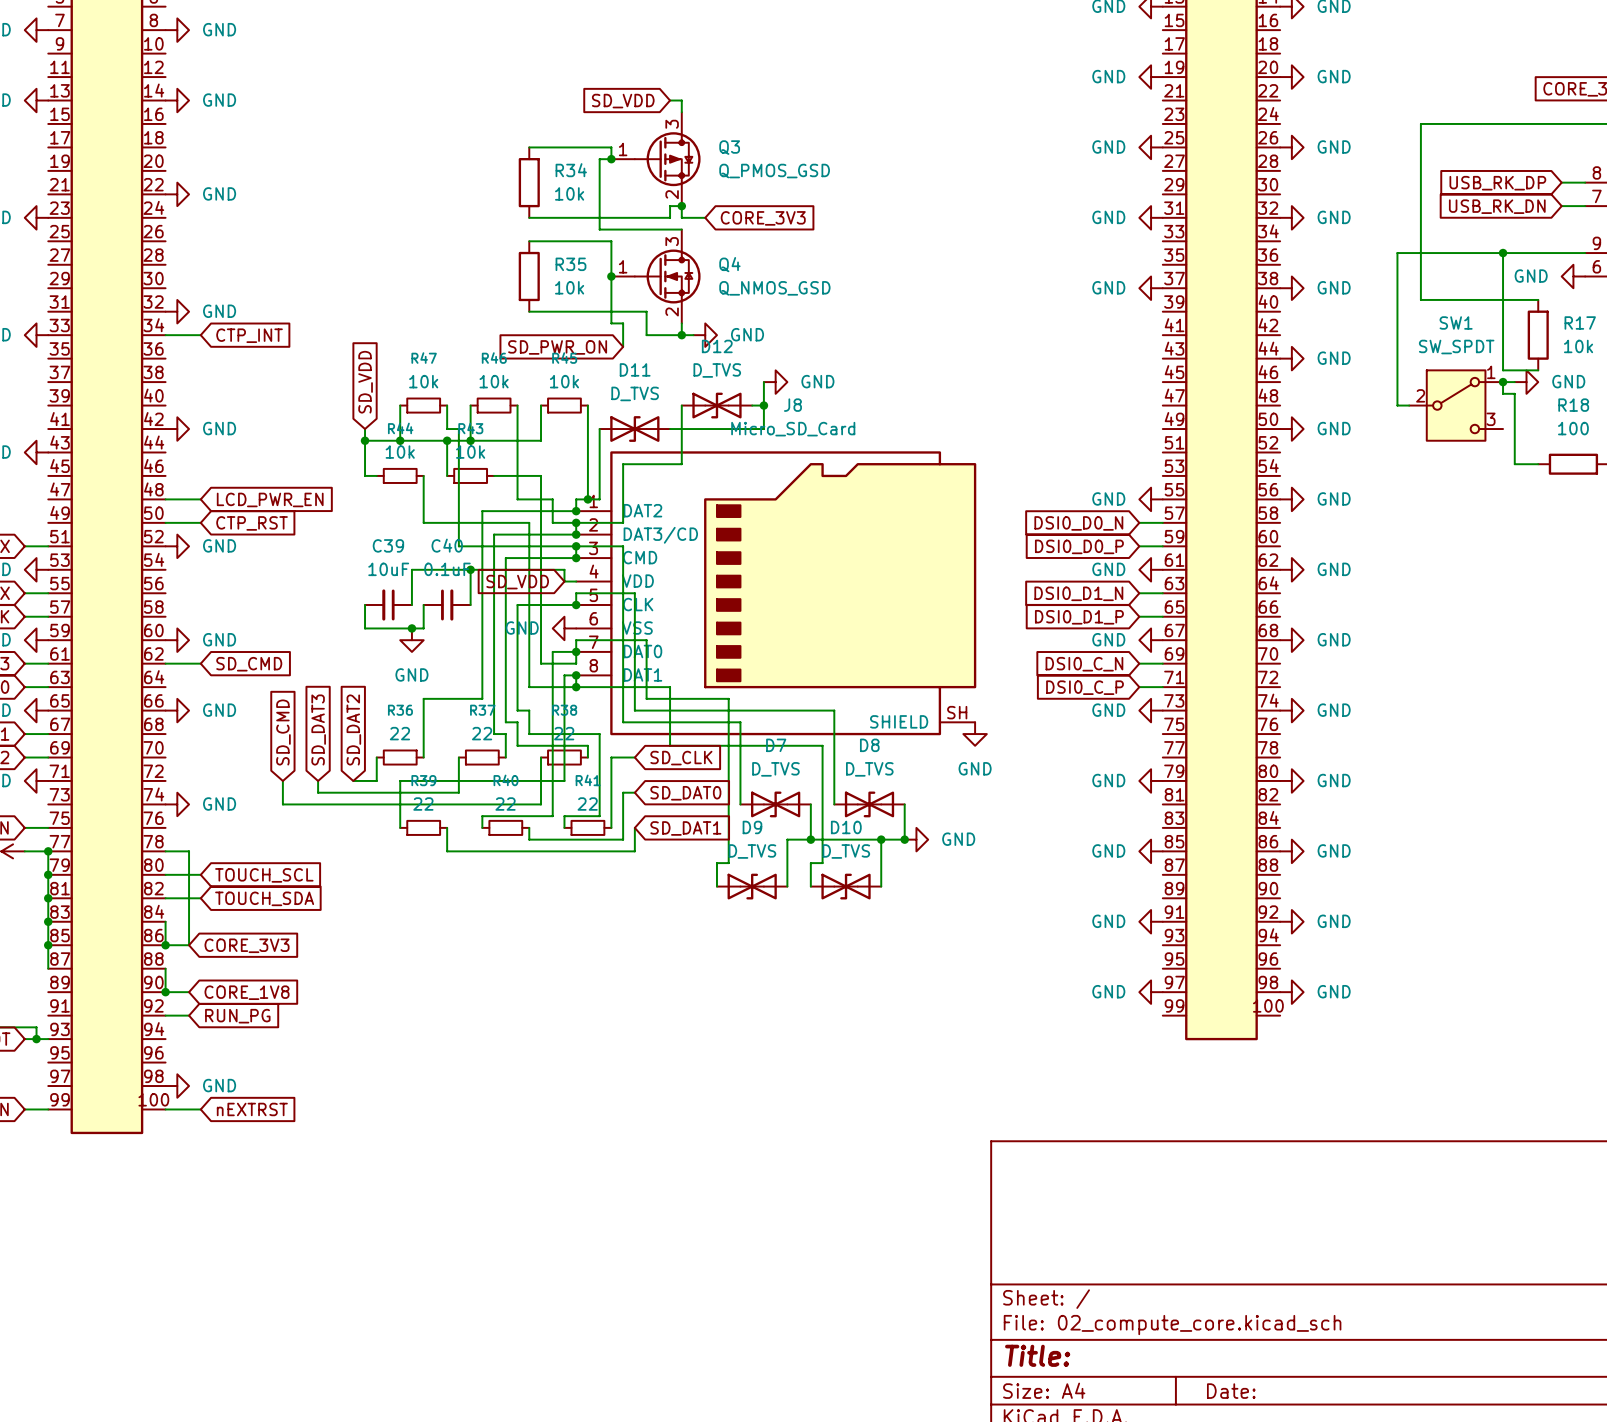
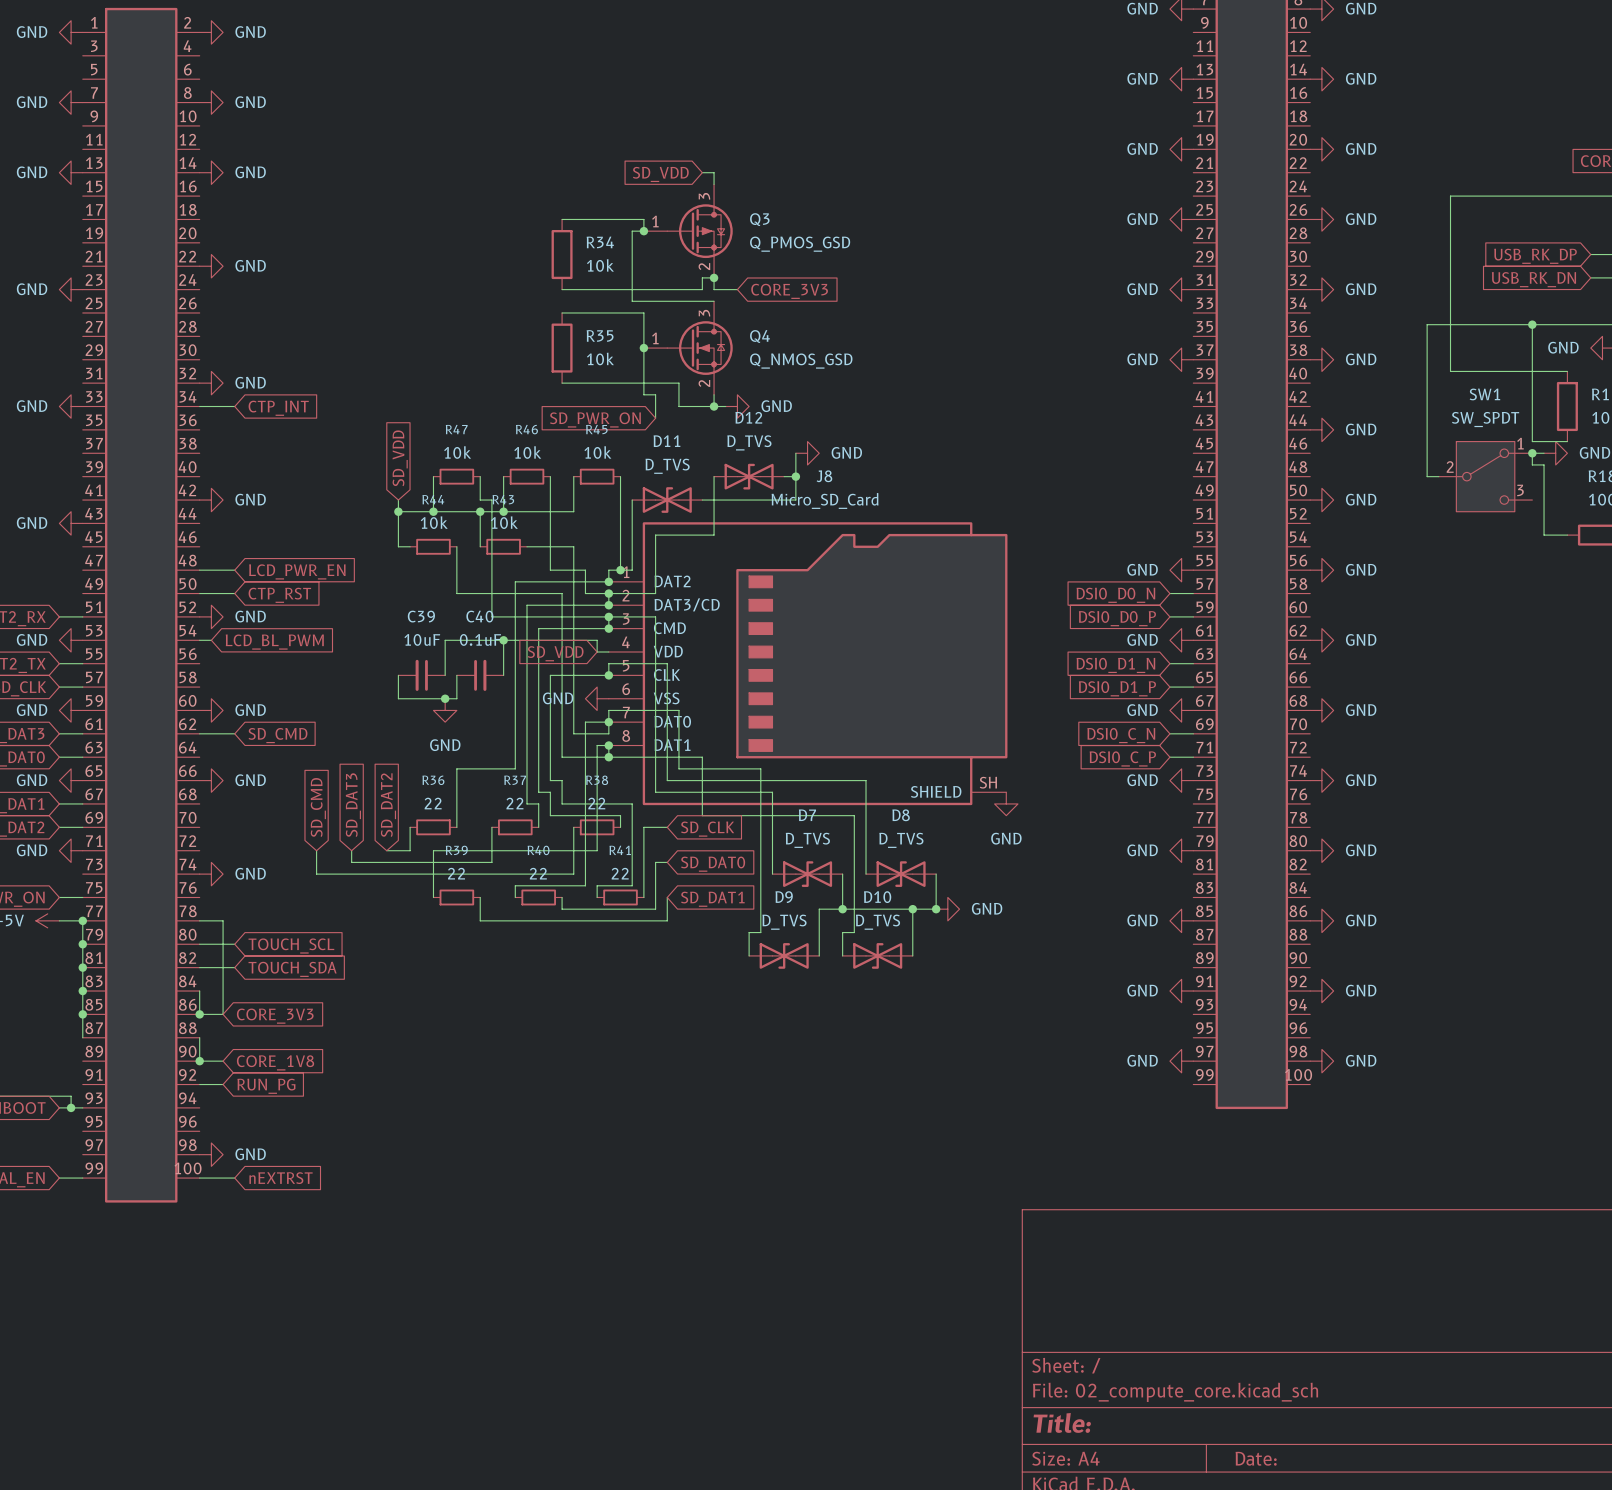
wire: none -> (199, 640) (211, 640)
global label: none -> LCD_BL_PWM (274, 642)

